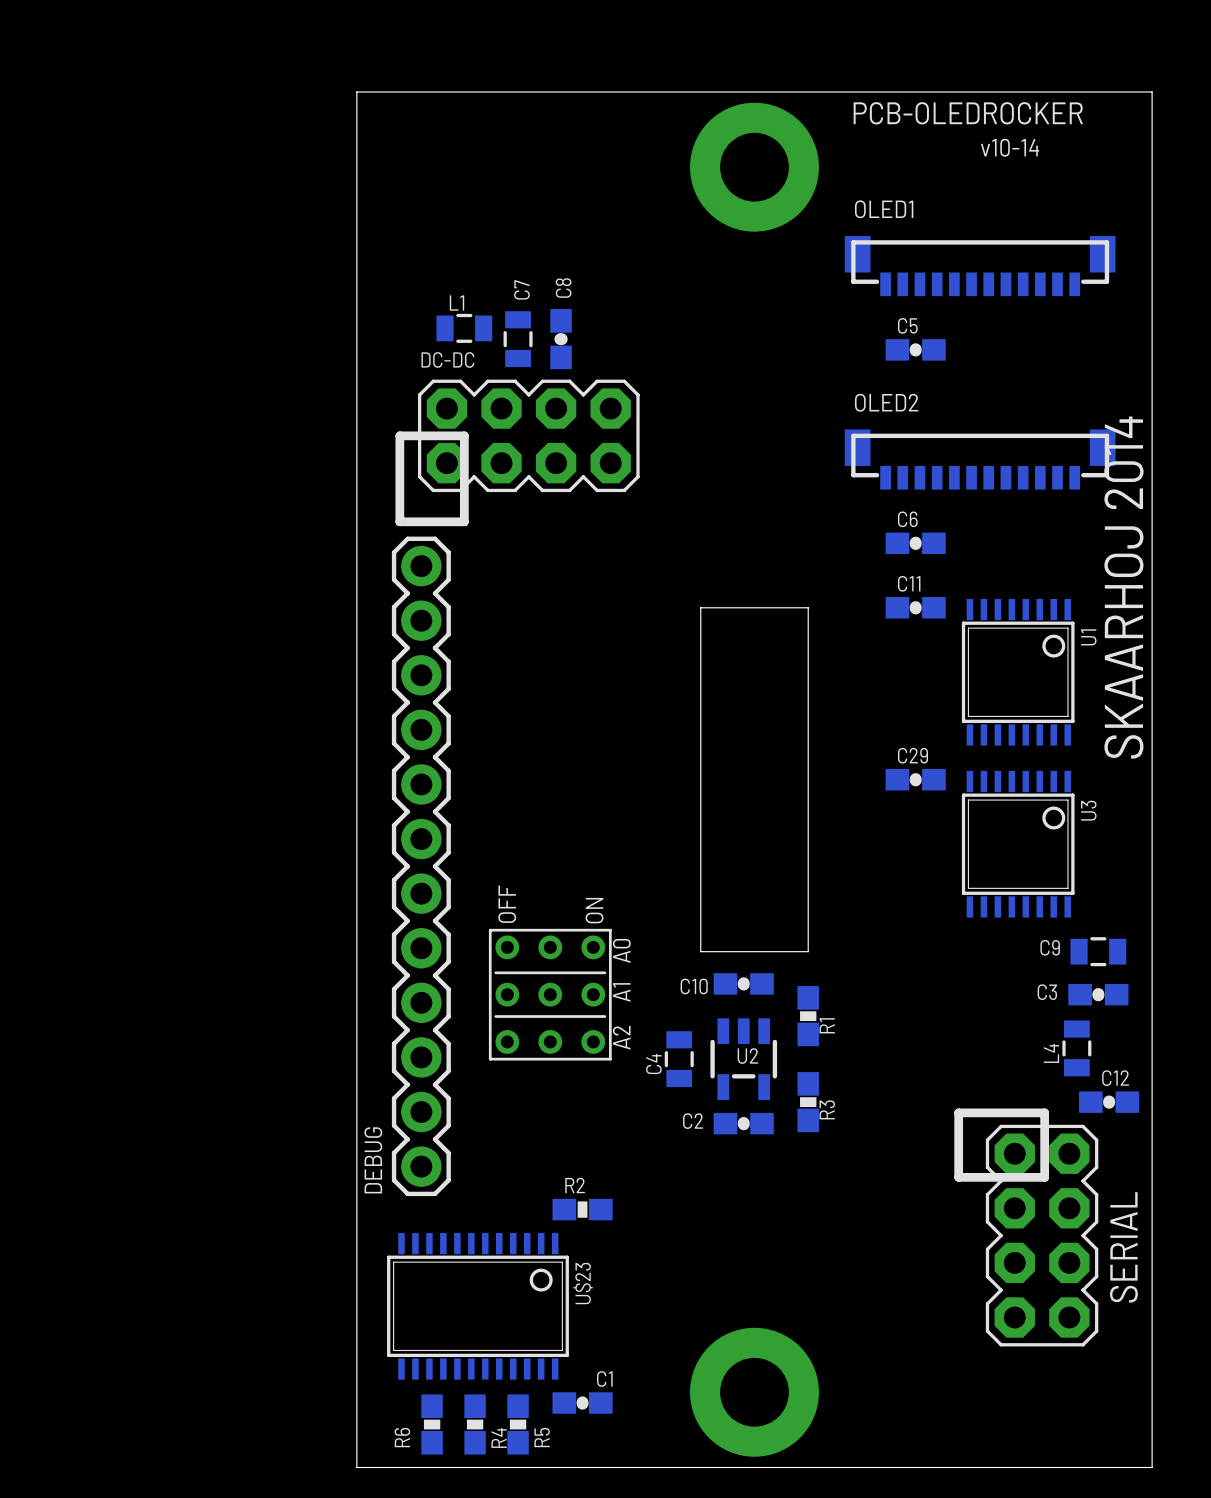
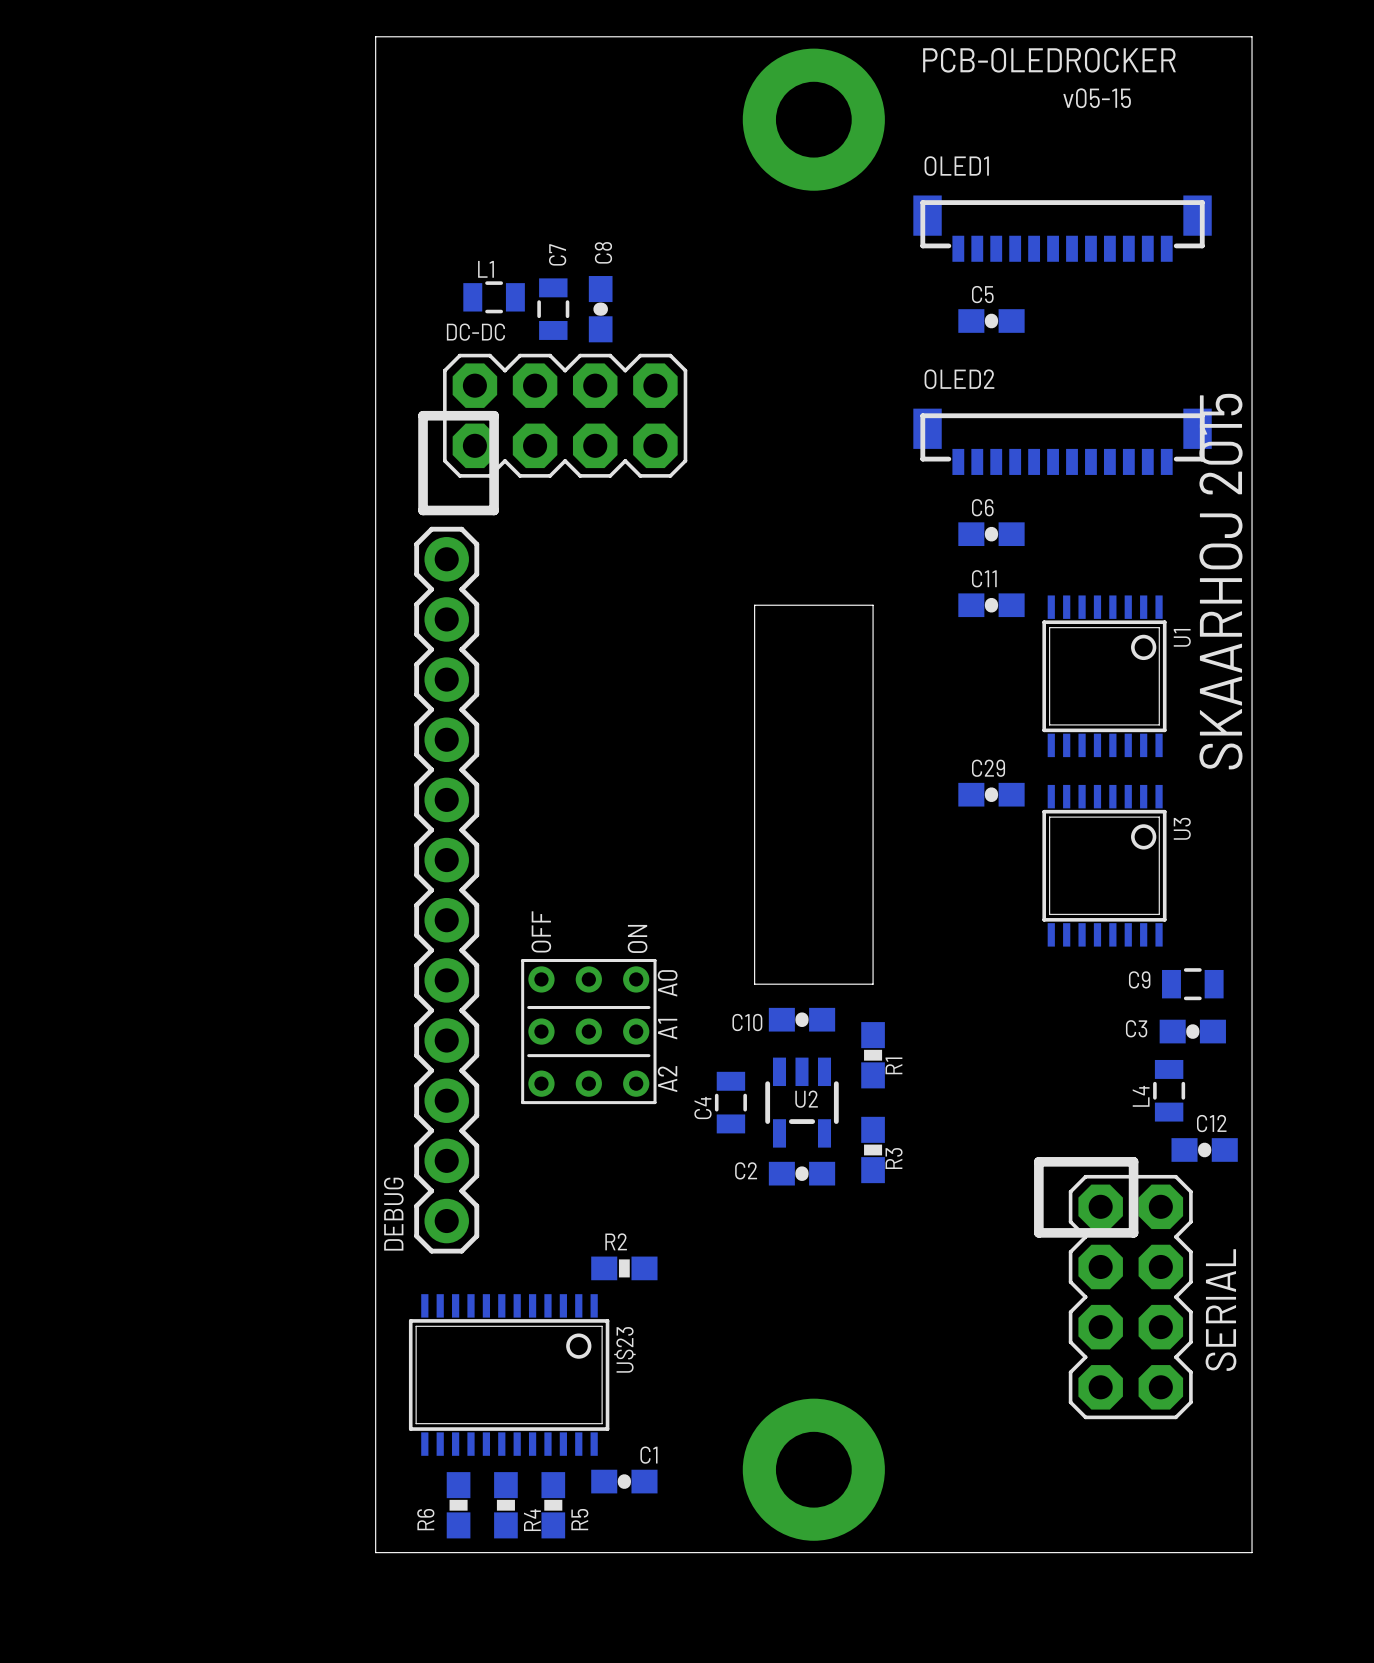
text: v10-14 (1009, 147) -> v05-15 (1097, 98)
text: SKAARHOJ 2014 (1123, 587) -> SKAARHOJ 2015 (1220, 581)

